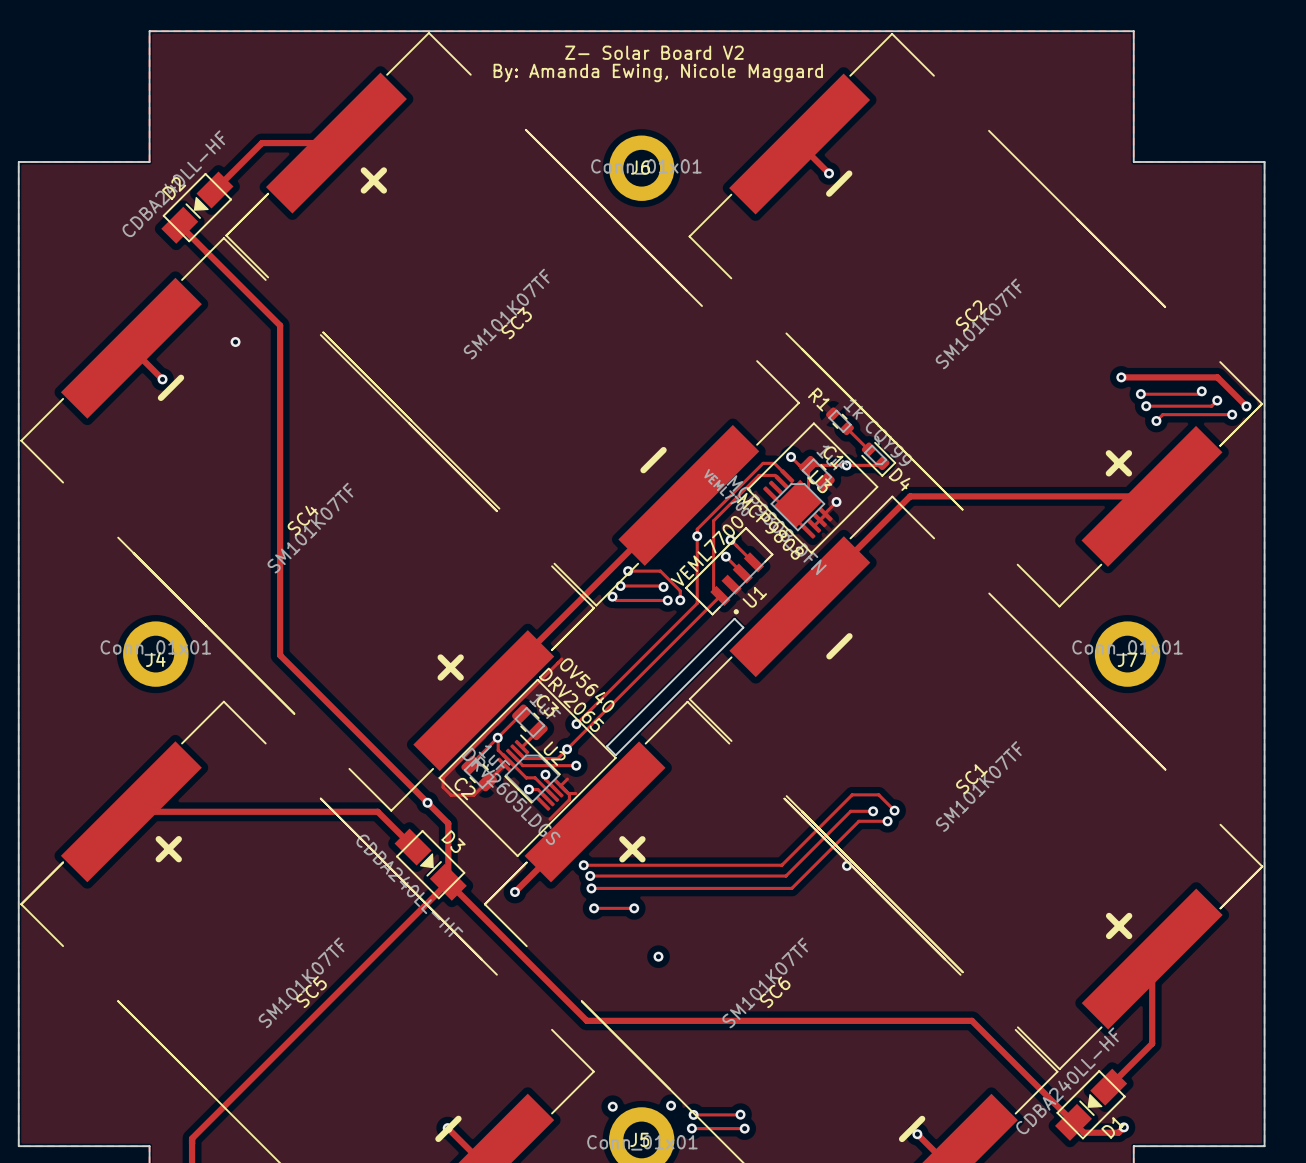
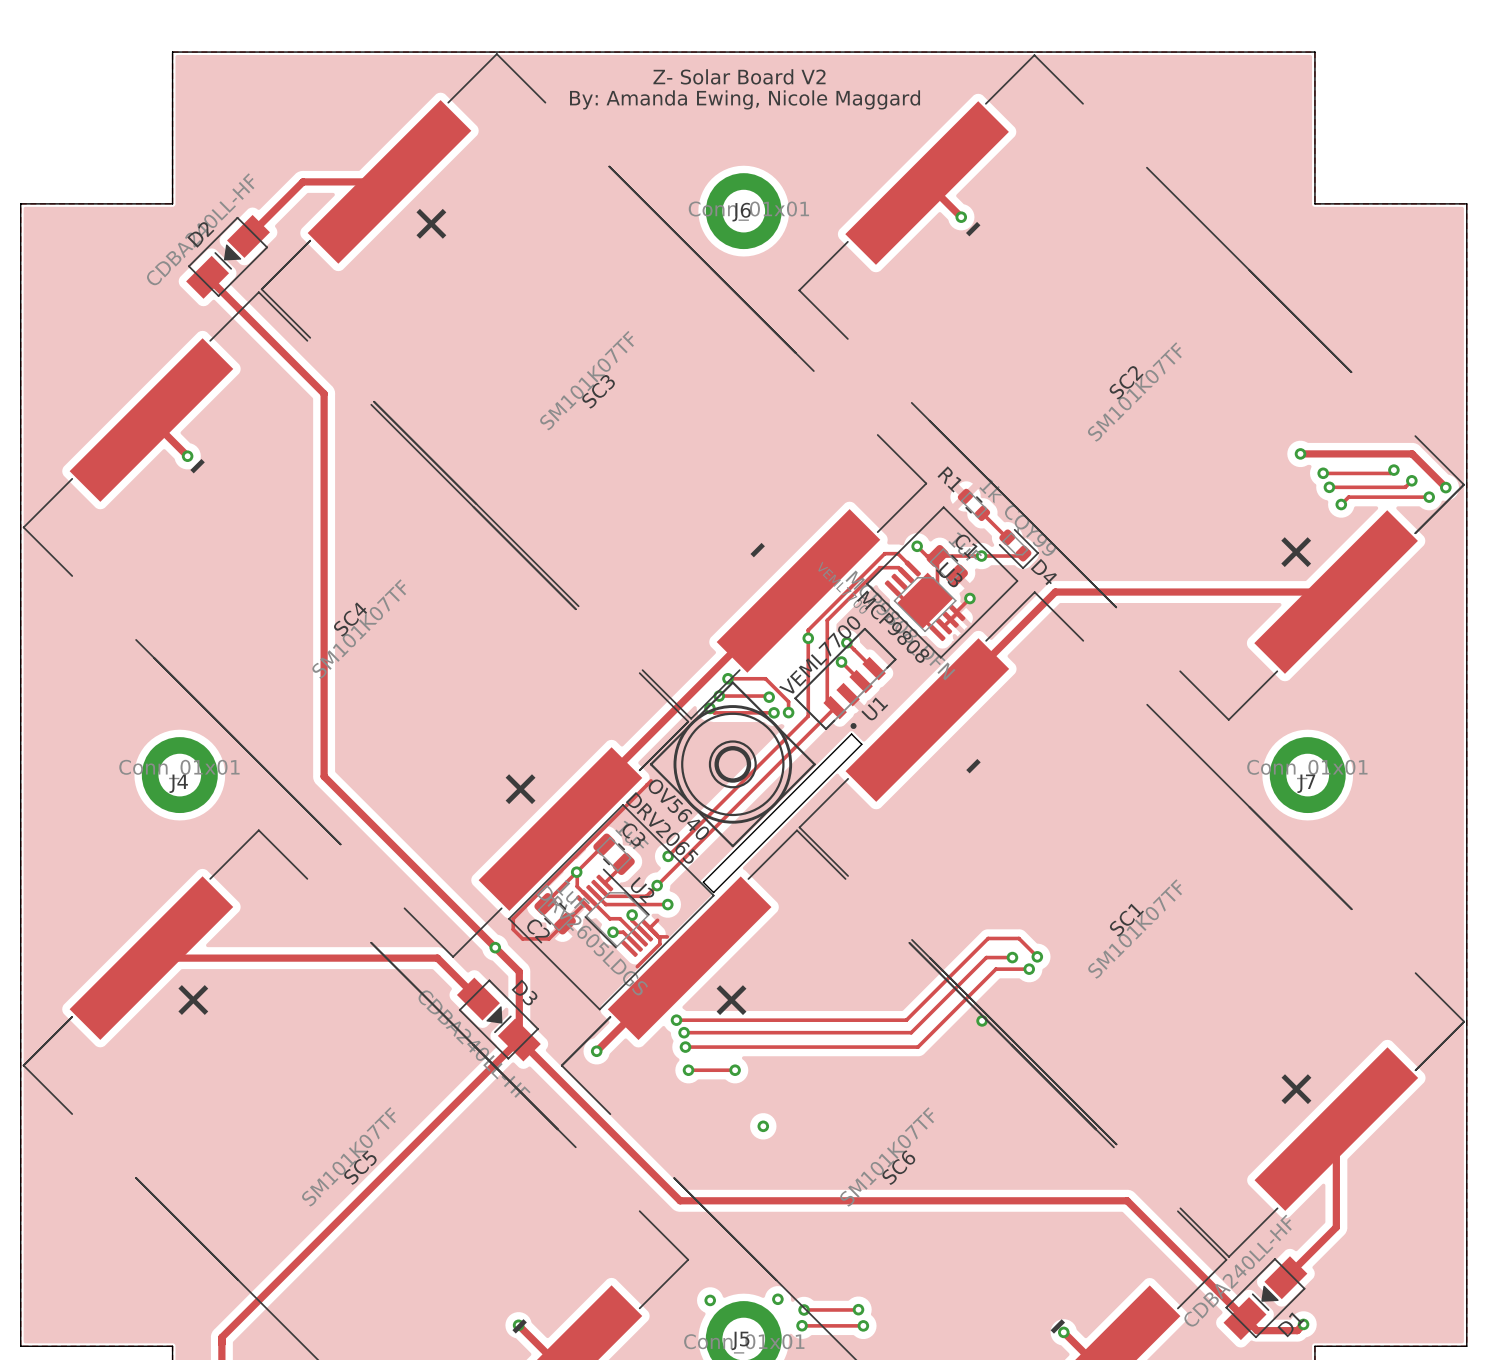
via: (235, 342) -> none
drawing: none -> [649, 681, 816, 848]

